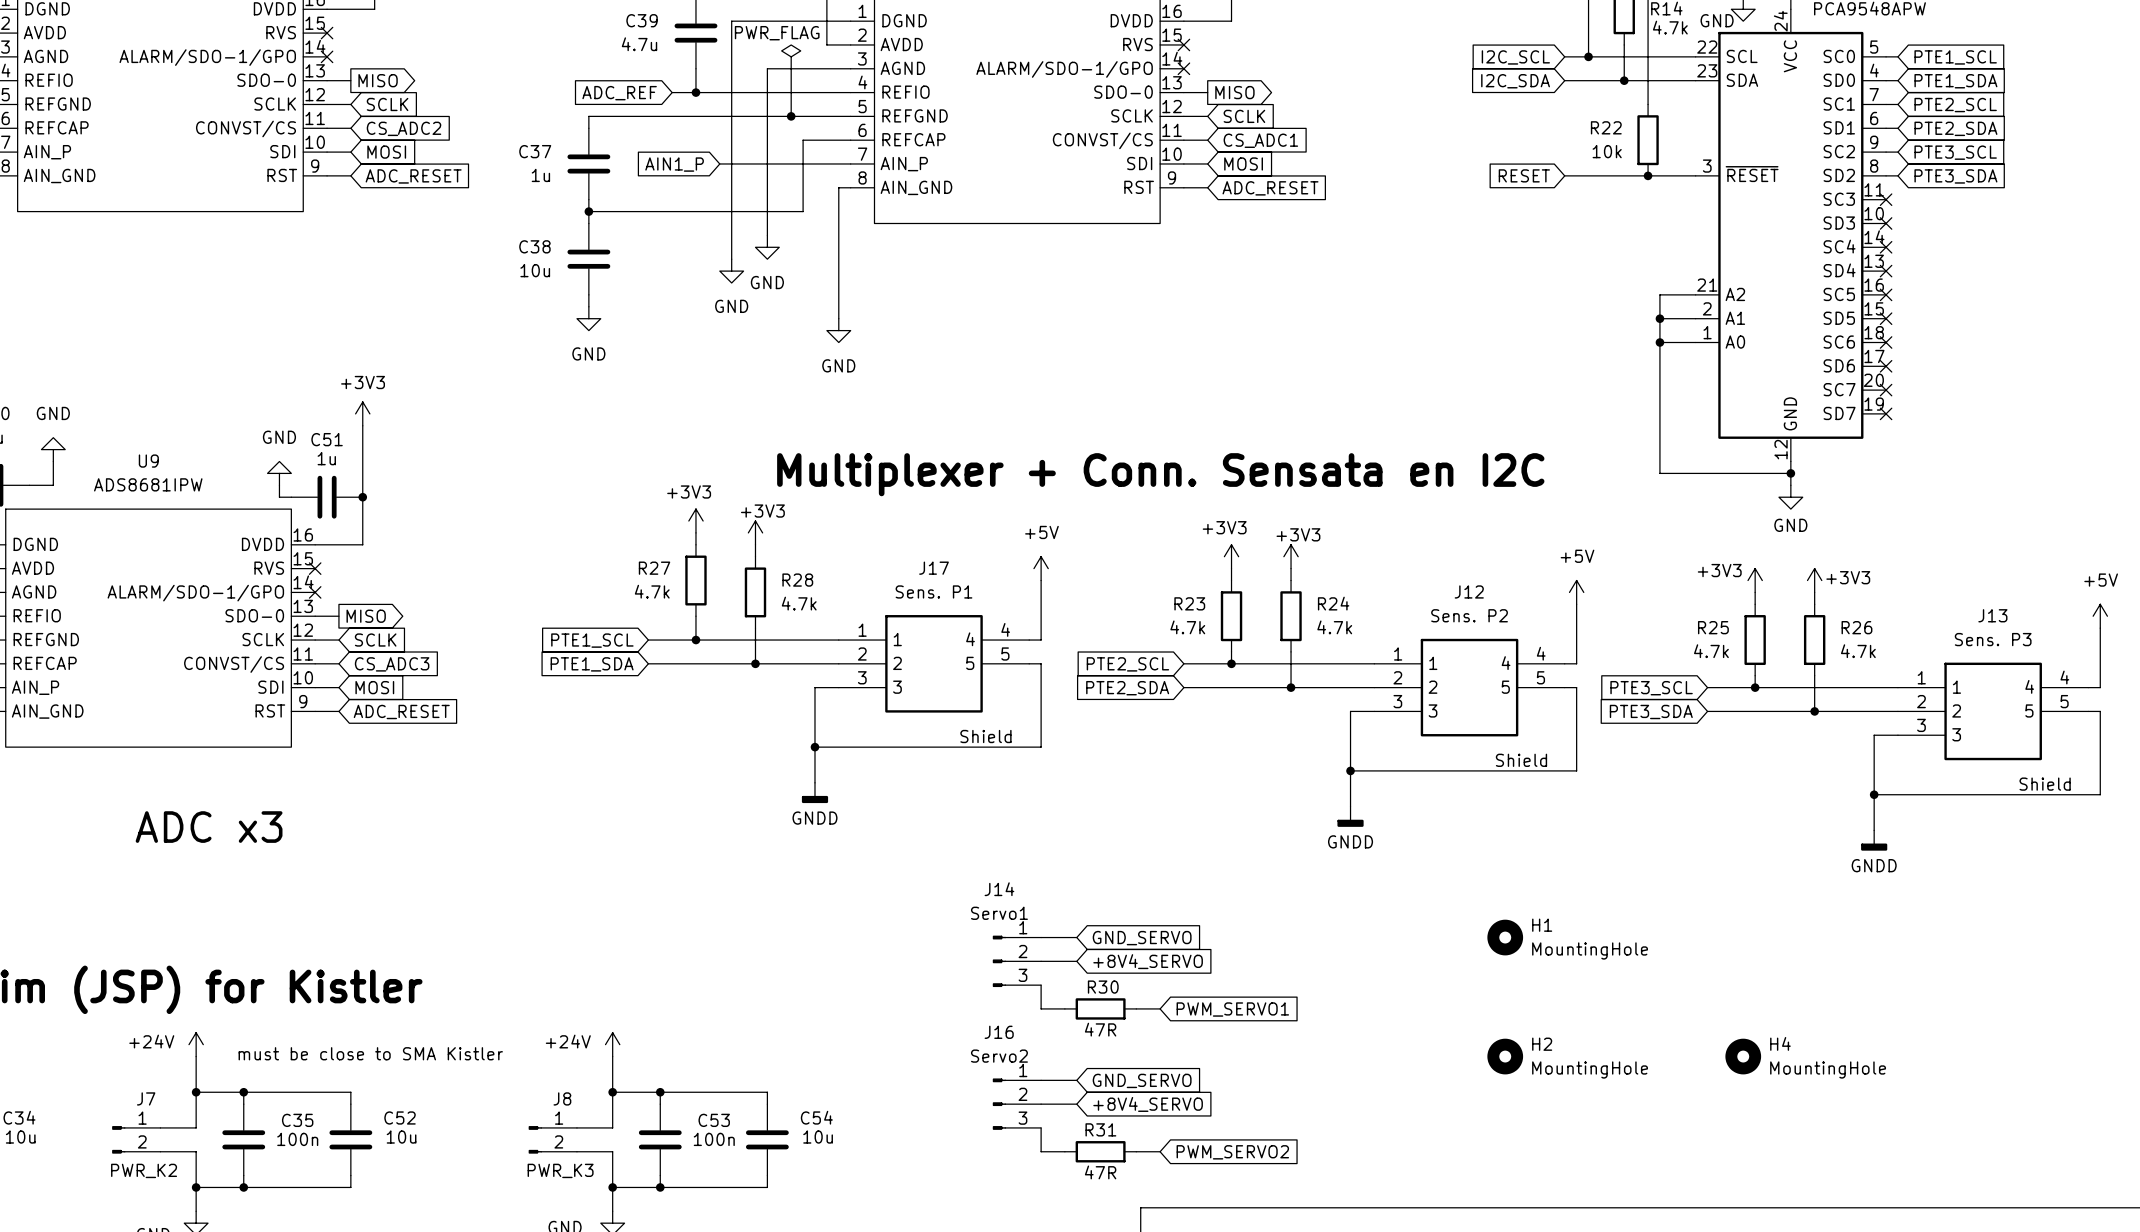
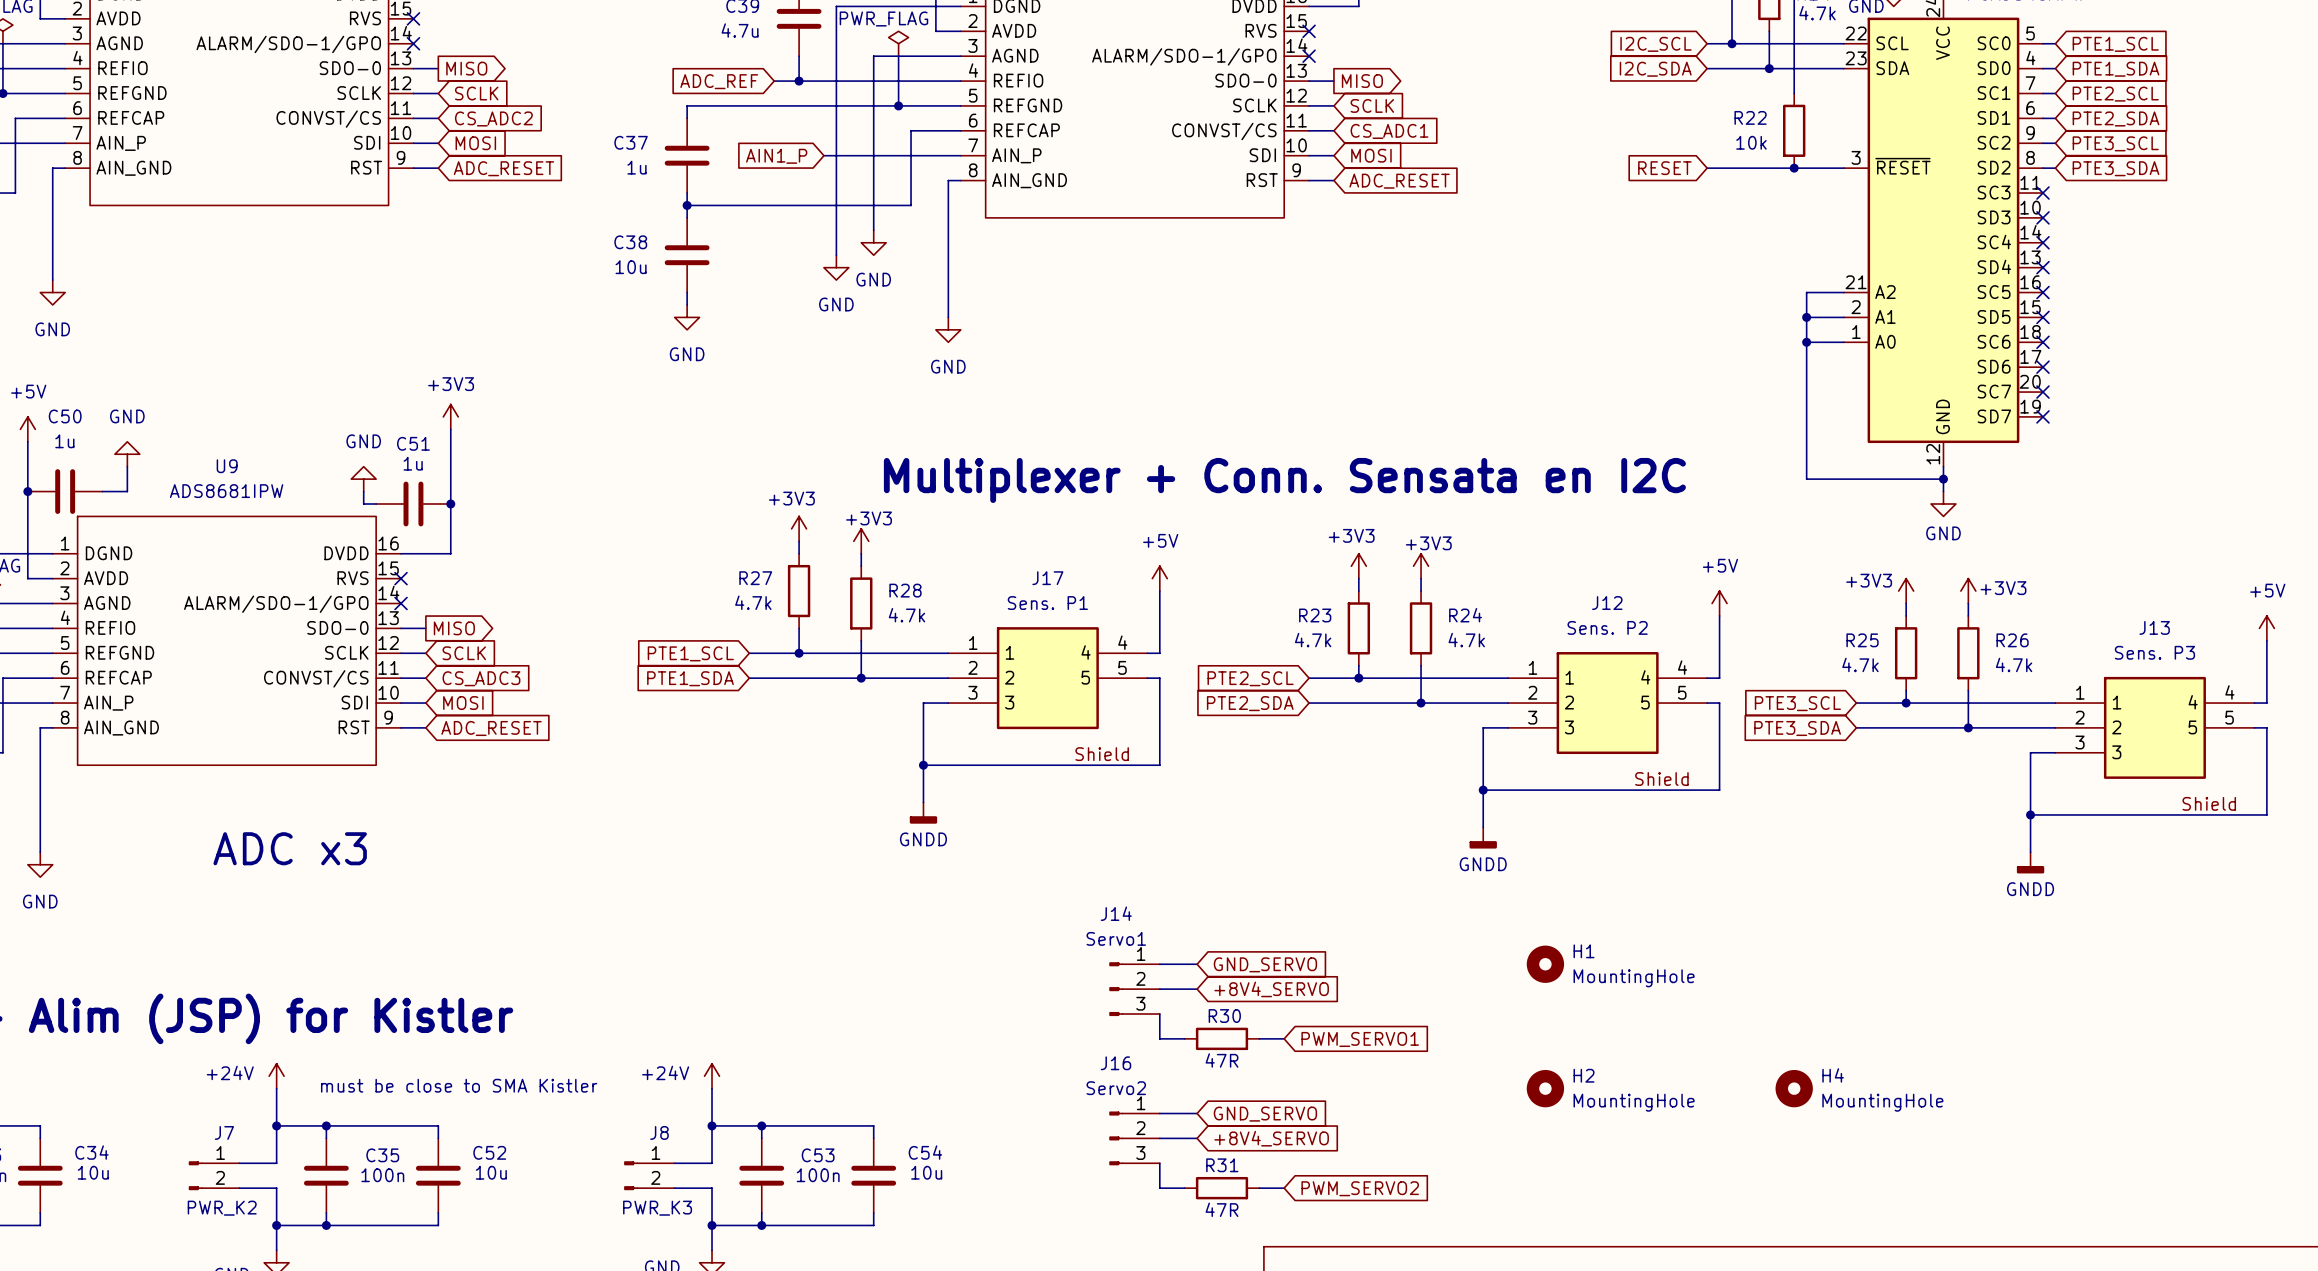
H1 position: (1505, 937) -> (1545, 964)
H2 position: (1505, 1056) -> (1545, 1088)
H4 position: (1743, 1056) -> (1794, 1088)

